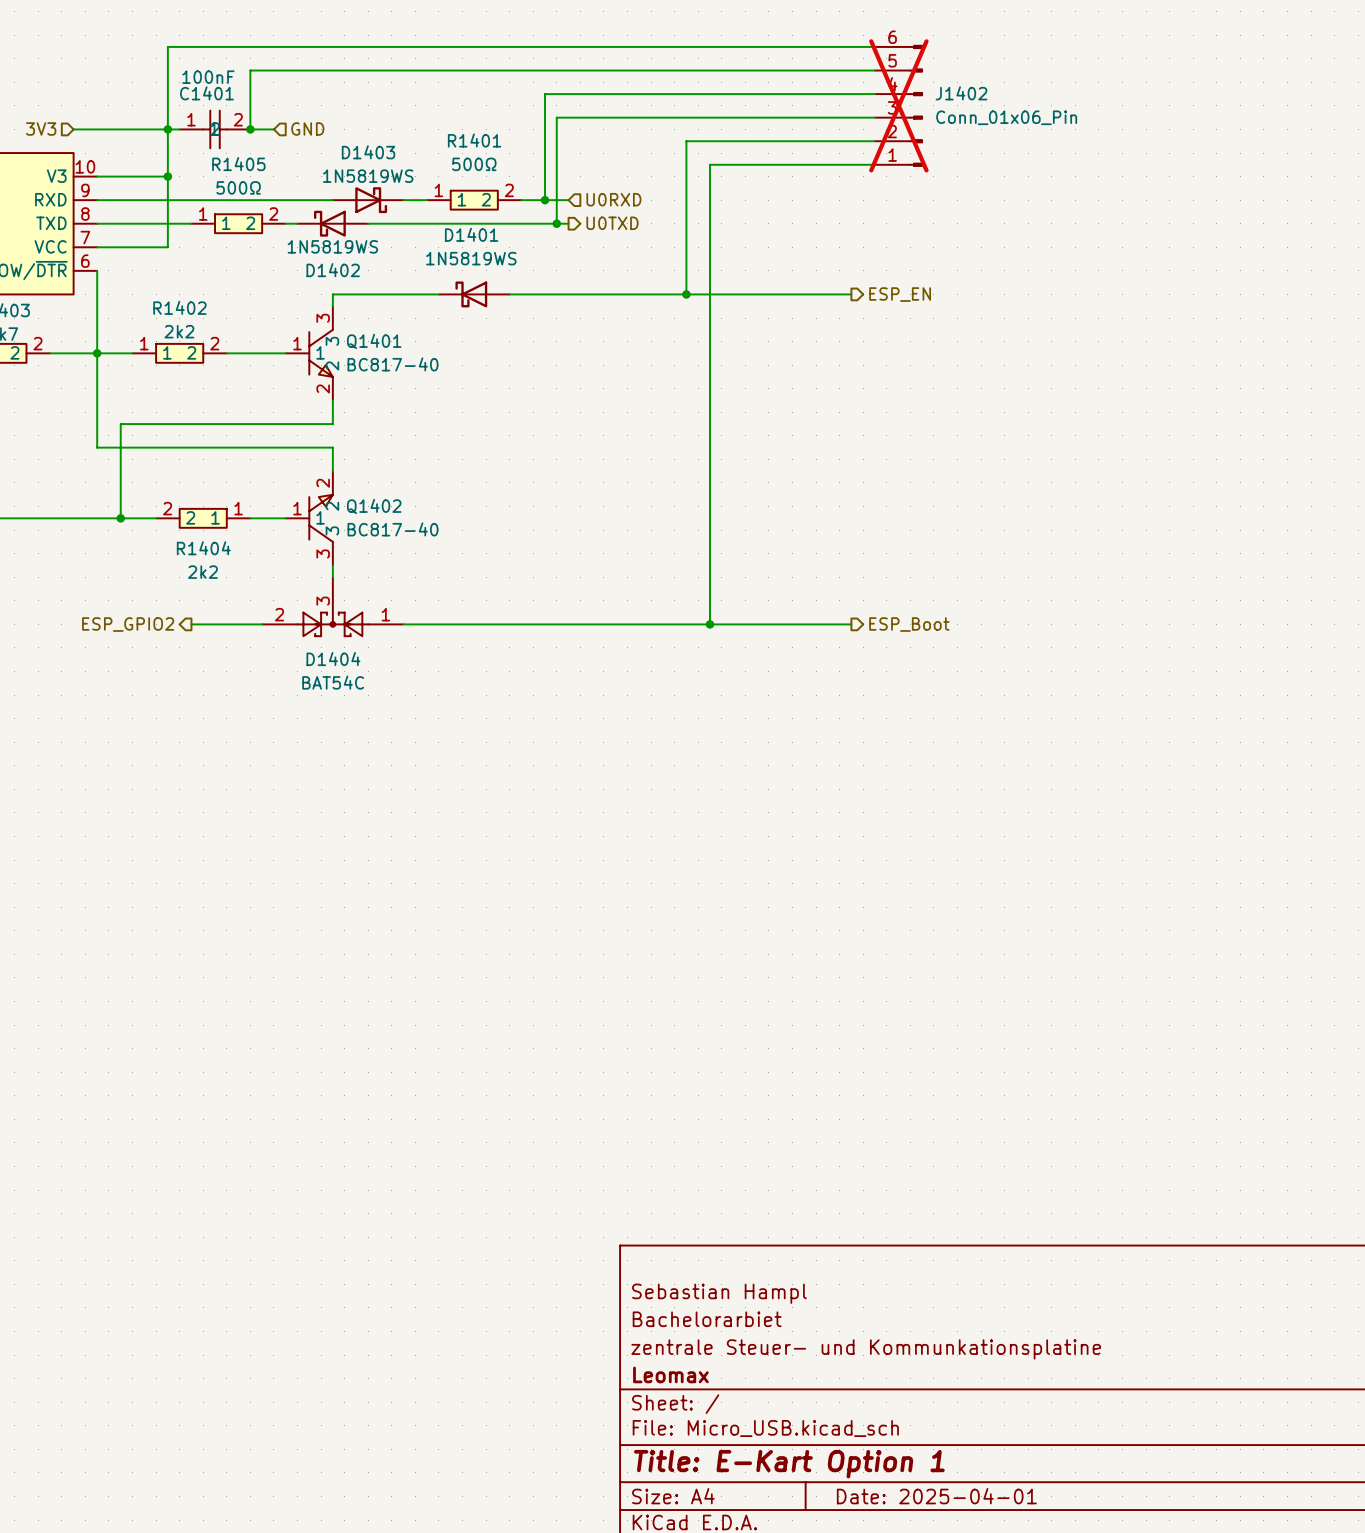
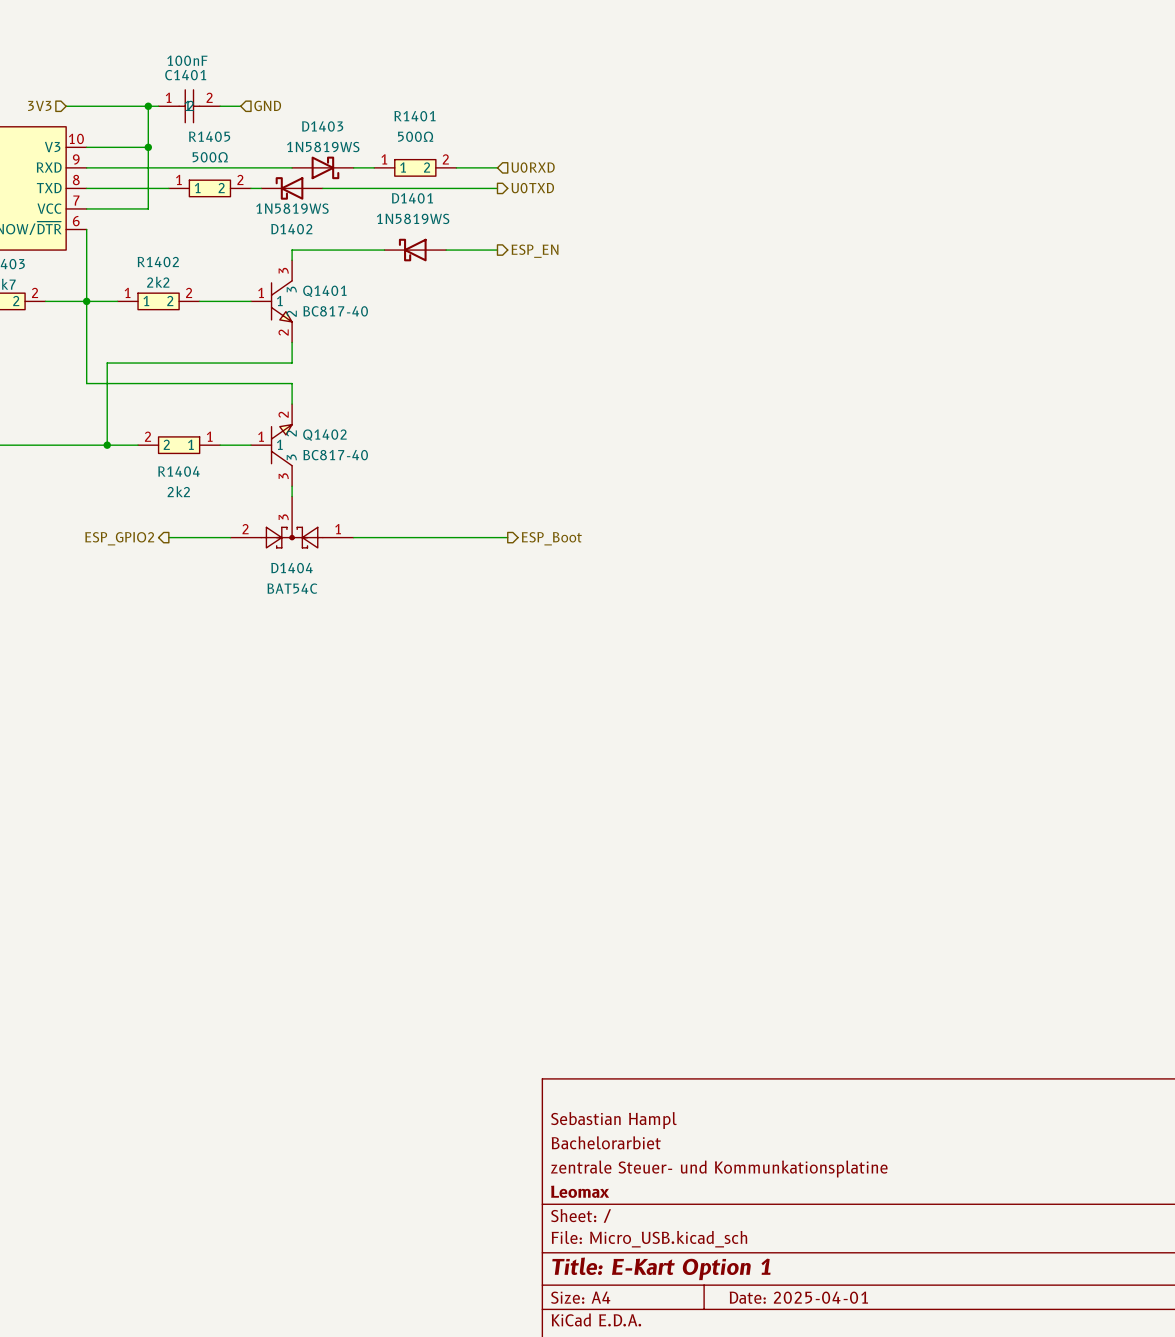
wire: (874, 46) (167, 46) (167, 129) -> none
wire: (874, 70) (250, 70) (250, 129) -> none
wire: (874, 94) (544, 94) (544, 200) -> none
J1402: Conn_01x06_Pin (898, 105) -> none
wire: (874, 117) (556, 117) (556, 223) -> none
junction: (250, 129) -> none
wire: (874, 141) (686, 141) (686, 294) -> none
wire: (874, 164) (709, 164) (709, 624) -> none
junction: (544, 200) -> none
junction: (556, 223) -> none
wire: (568, 294) (851, 294) -> none
hierarchical label: none -> ESP_EN (535, 251)
junction: (686, 294) -> none
hierarchical label: ESP_EN (900, 294) -> none
wire: (580, 624) (851, 624) -> none
hierarchical label: none -> ESP_Boot (551, 538)
junction: (709, 624) -> none
hierarchical label: ESP_Boot (909, 624) -> none

